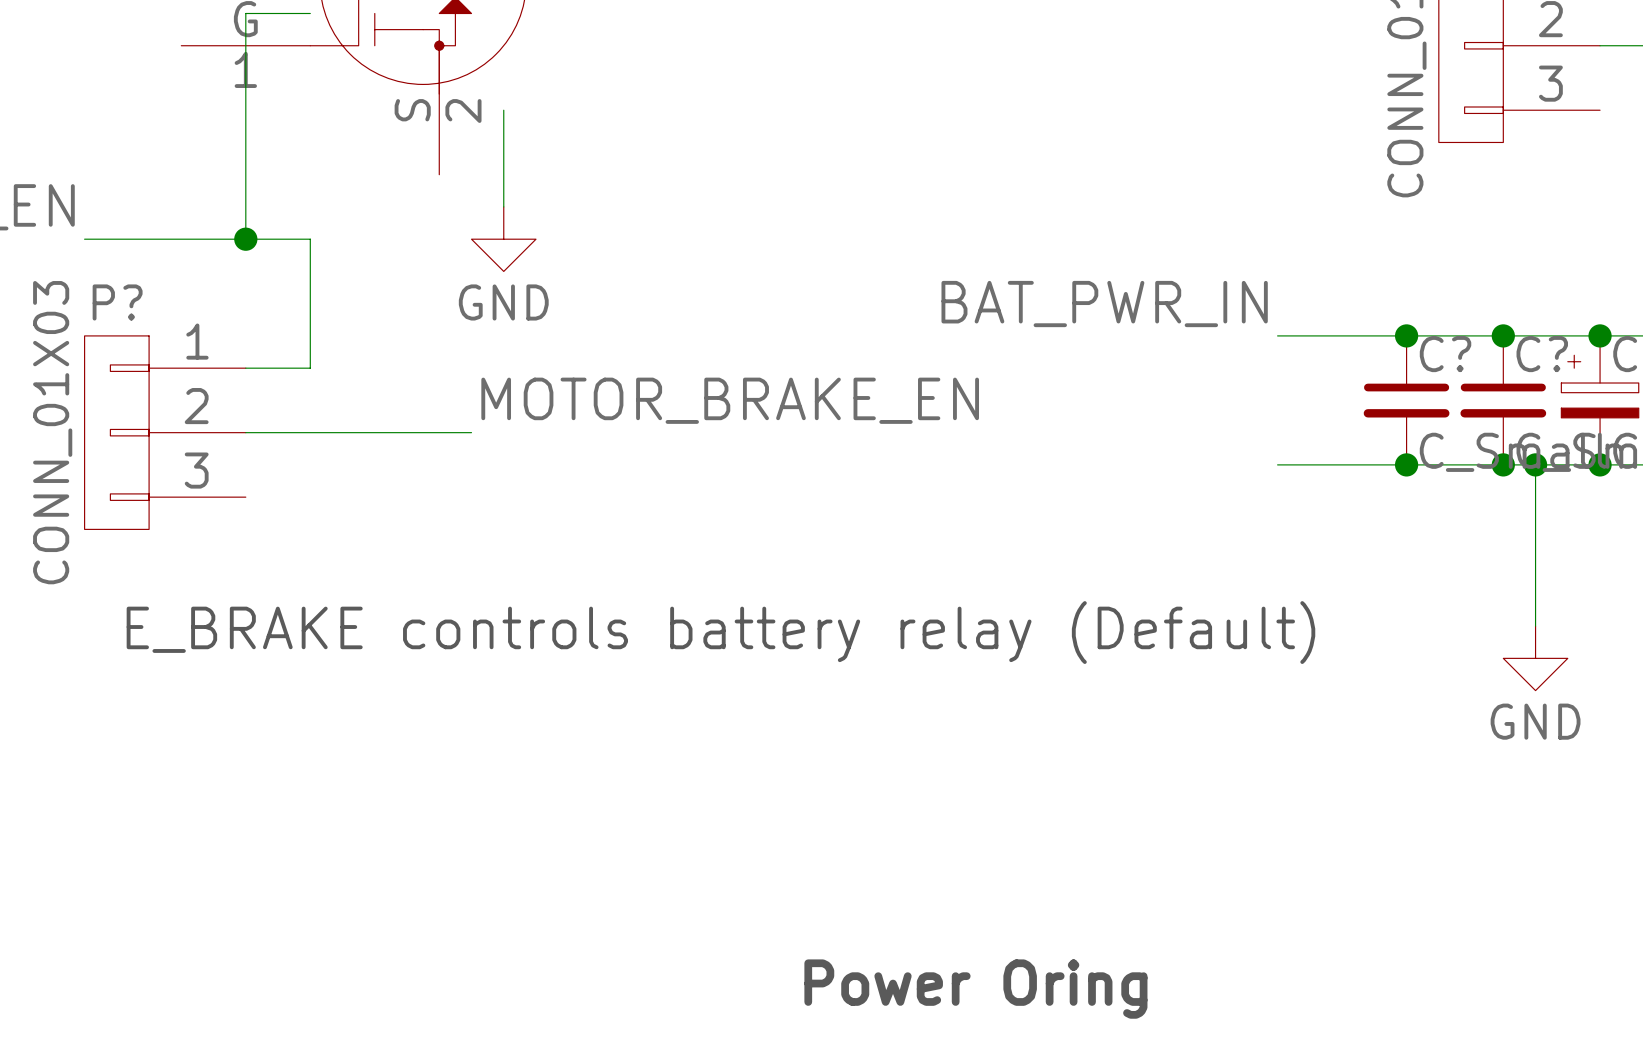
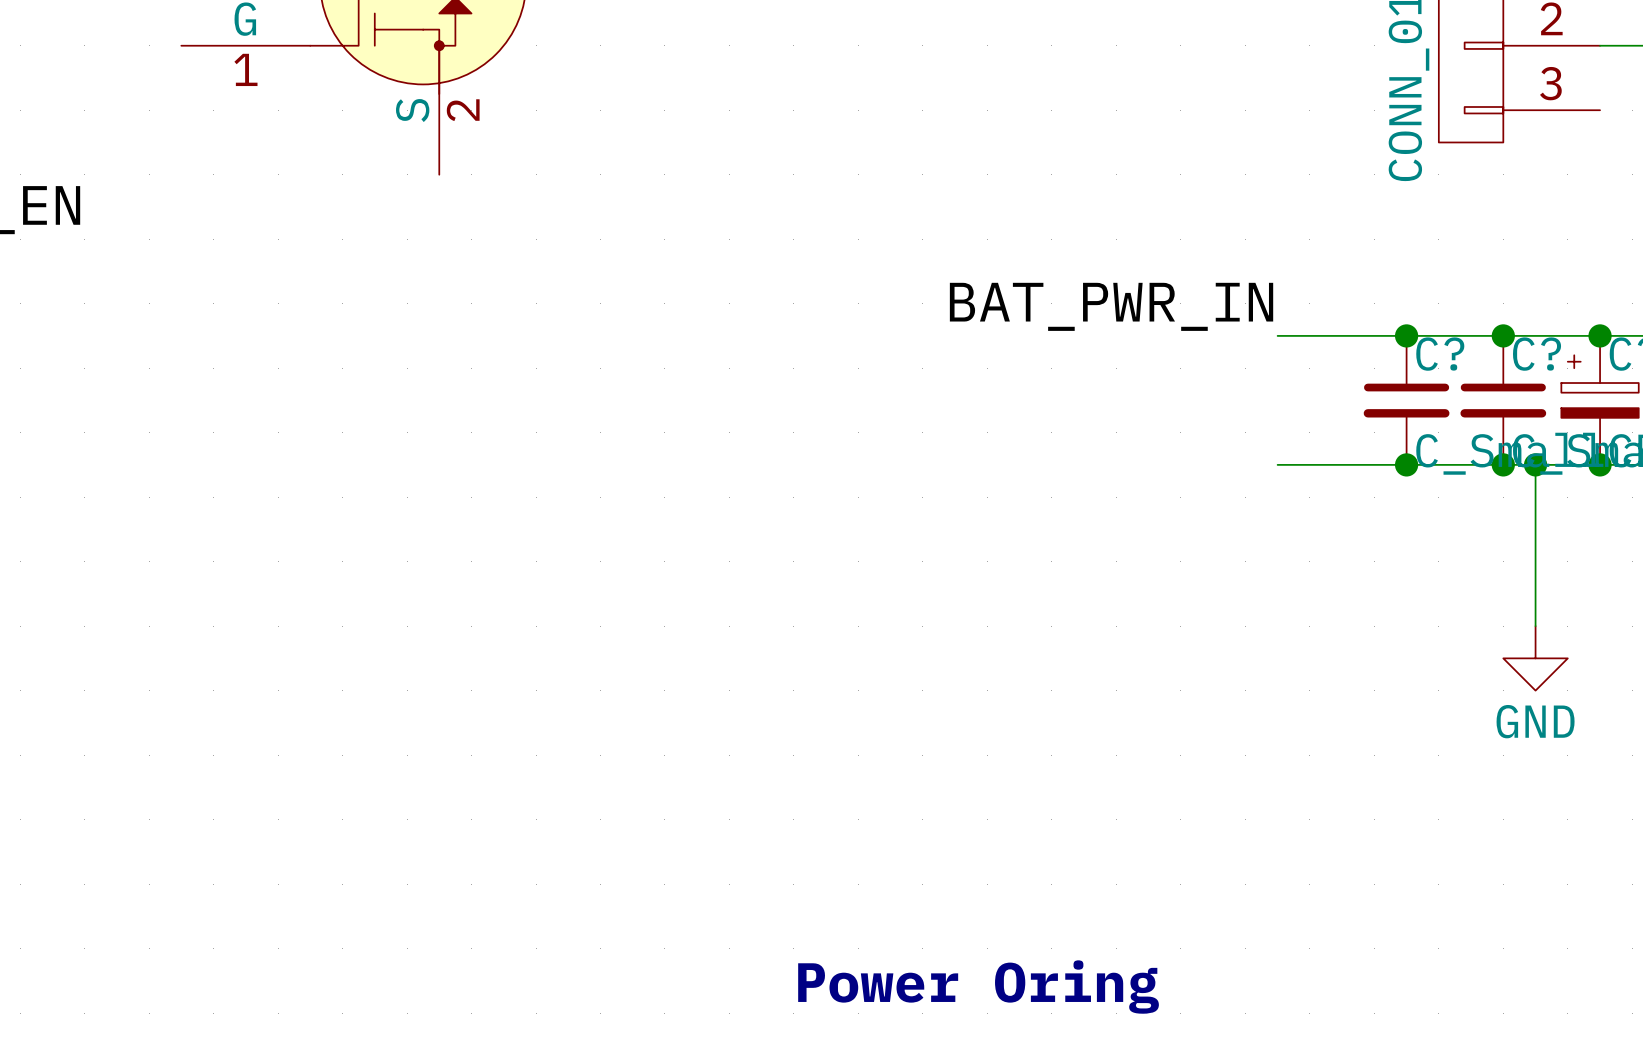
wire: (310, 13) (245, 13) (245, 239) -> none
wire: (503, 110) (503, 206) -> none
wire: (84, 239) (310, 239) (310, 368) (245, 368) -> none
junction: (245, 239) -> none
power symbol: GND (503, 239) -> none
label: MOTOR_BRAKE_EN (730, 400) -> none
P?: CONN_01X03 (165, 432) -> none
wire: (245, 432) (471, 432) -> none
text: E_BRAKE controls battery relay (Default) (720, 632) -> none

